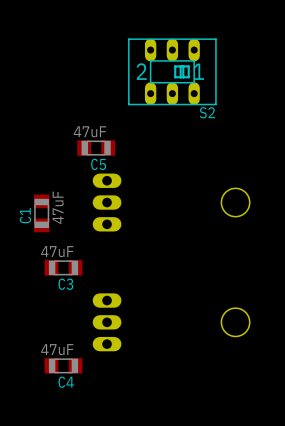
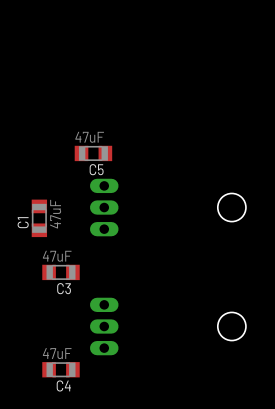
S2: (172, 71) -> none

